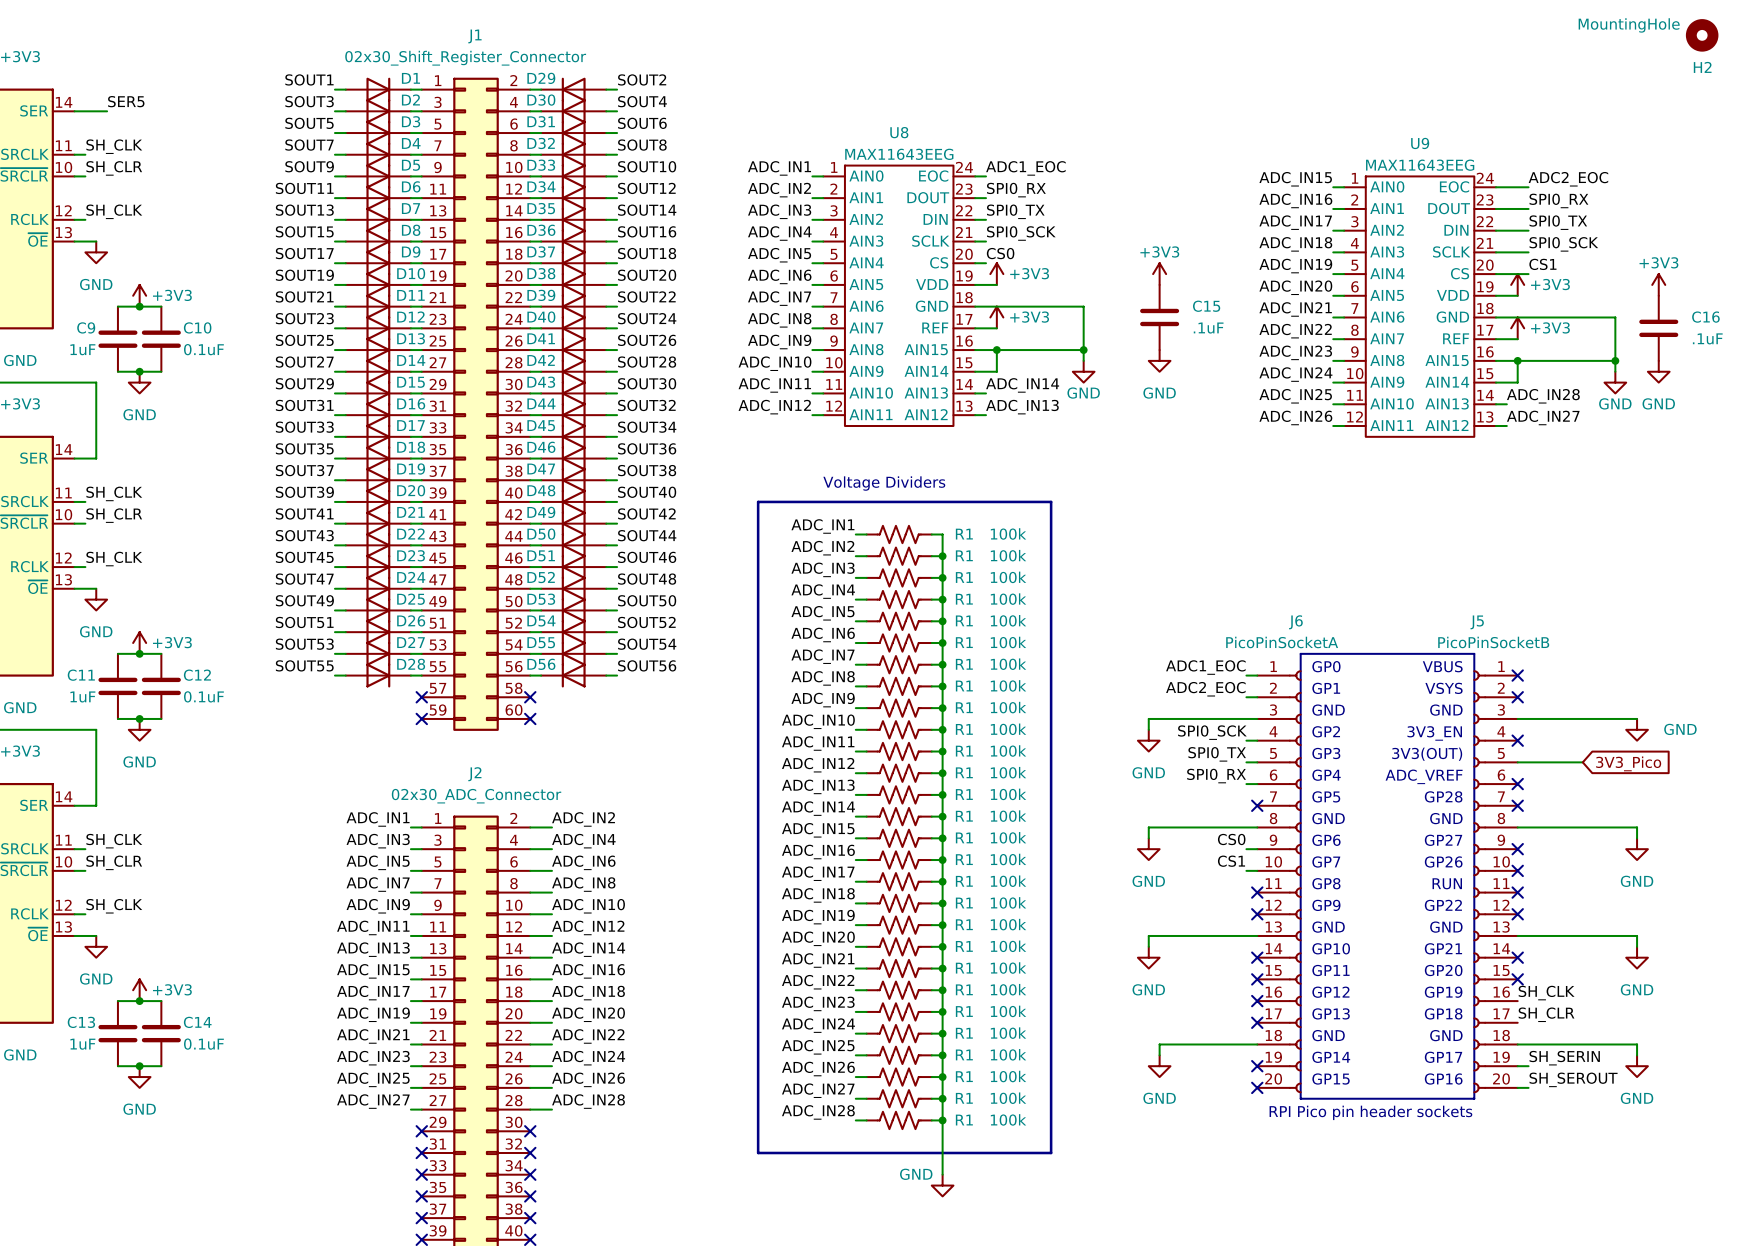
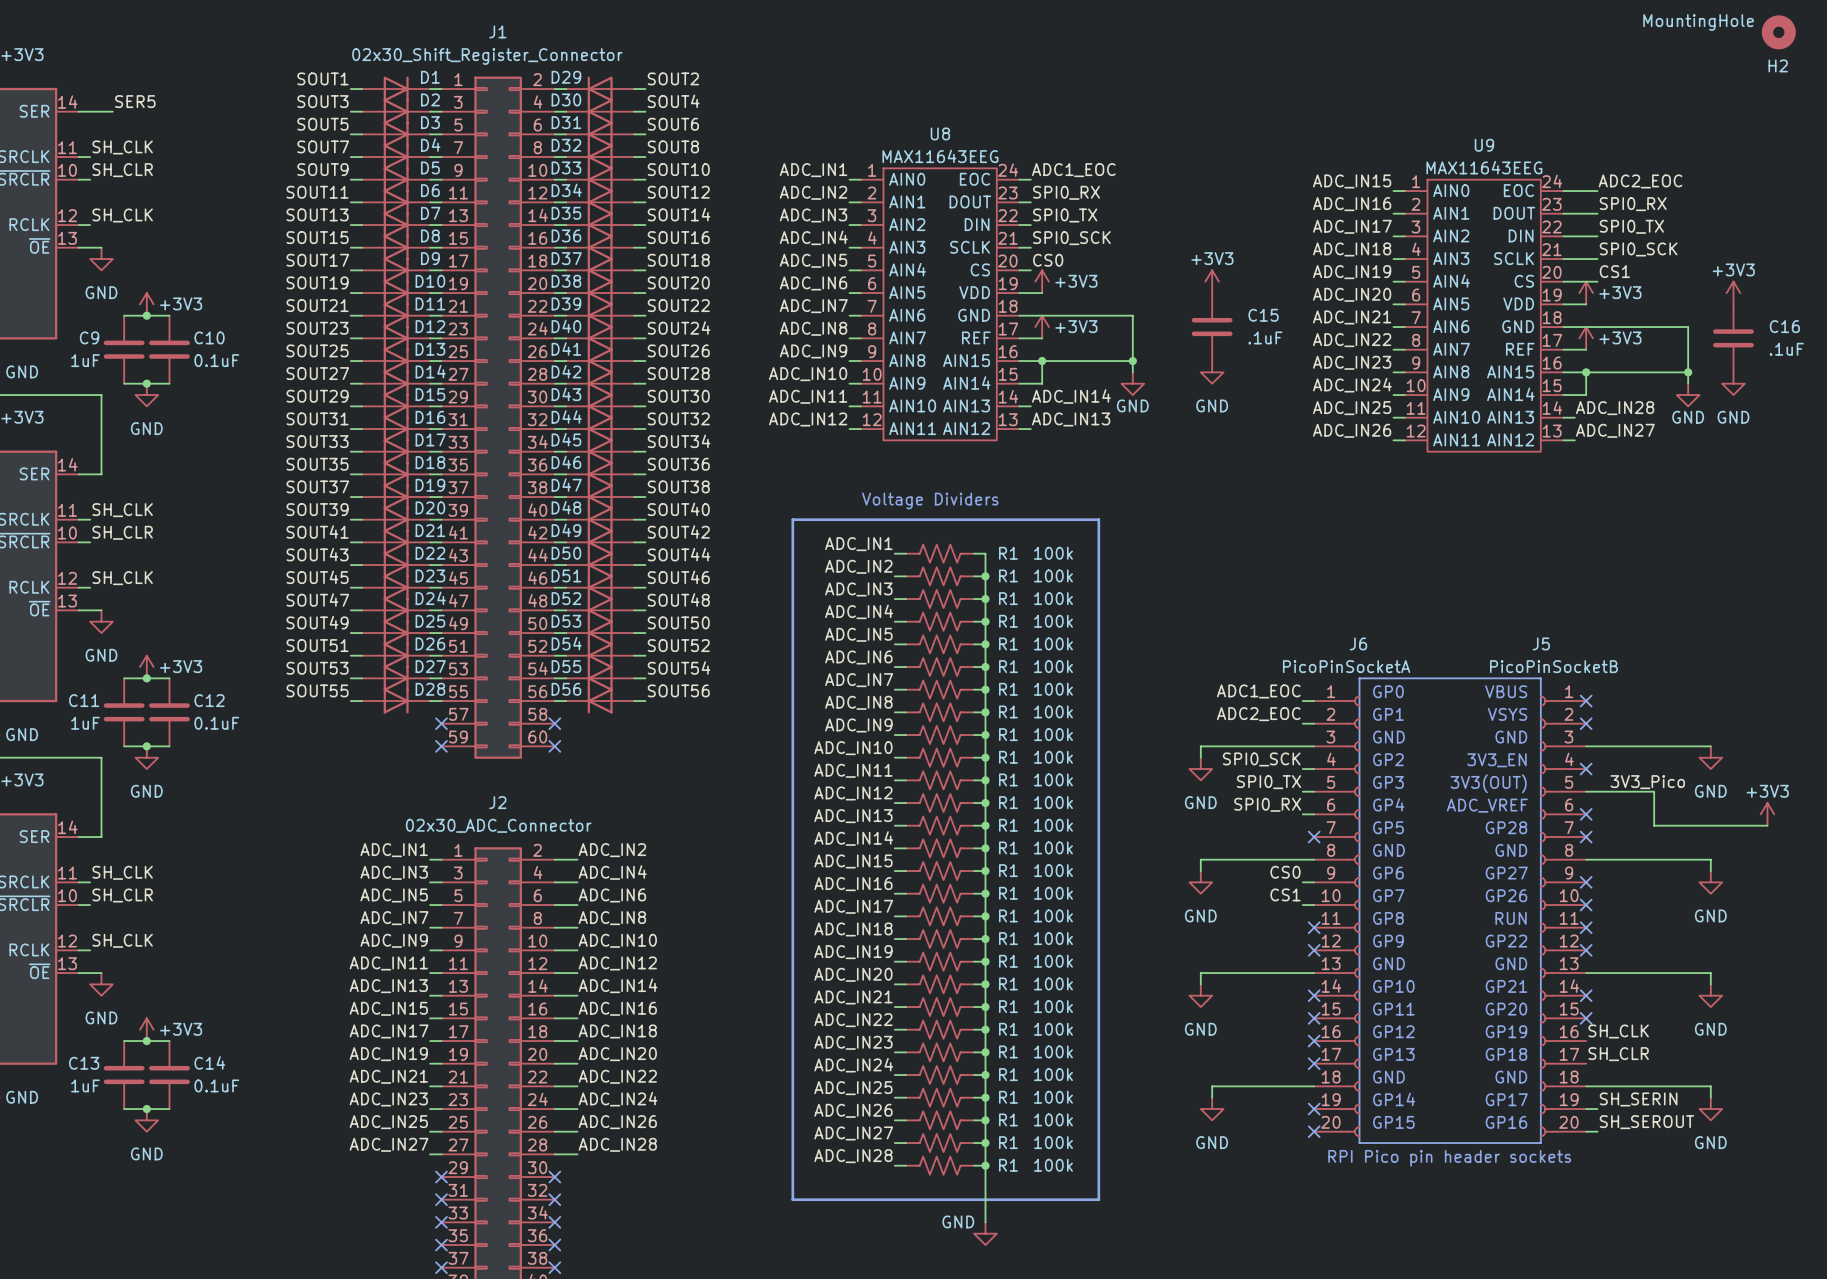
power symbol text position: GND (1680, 729) -> GND (1710, 791)
label: none -> 3V3_Pico (1647, 782)
wire: none -> (1654, 791) (1654, 825) (1767, 825)
global label: 3V3_Pico (1628, 763) -> none
power symbol: none -> +3V3 (1767, 814)

